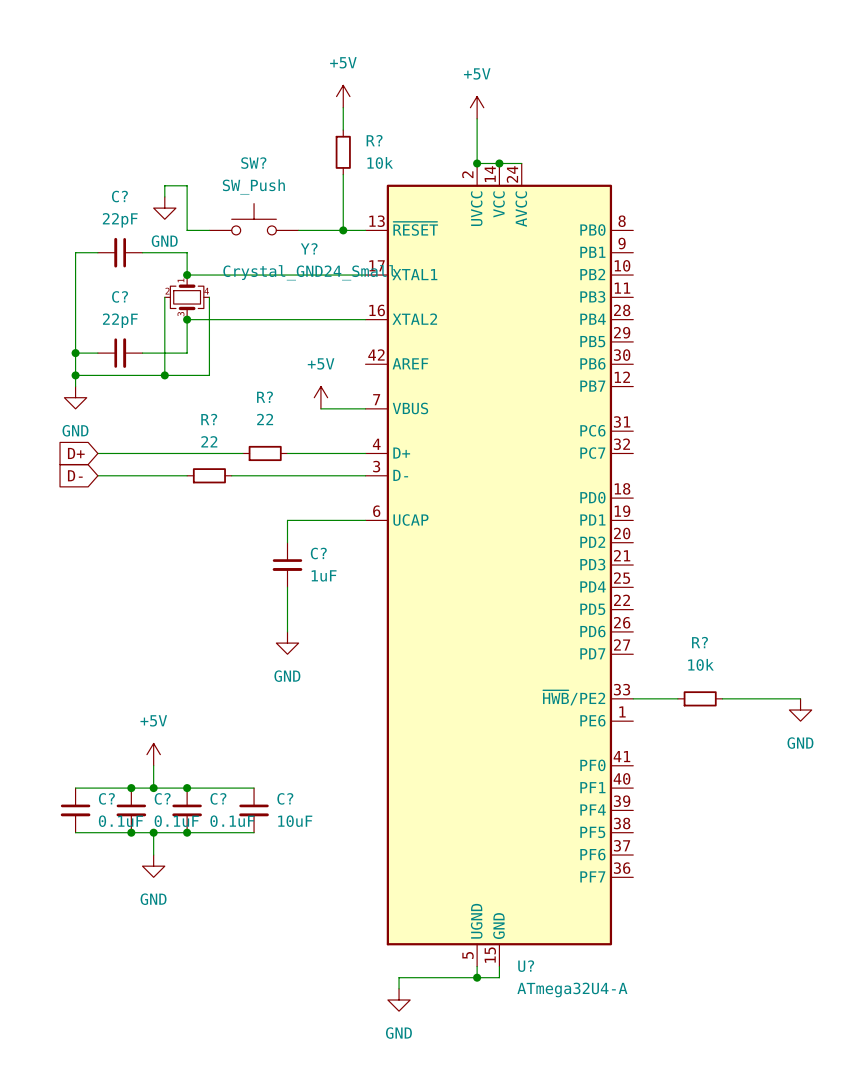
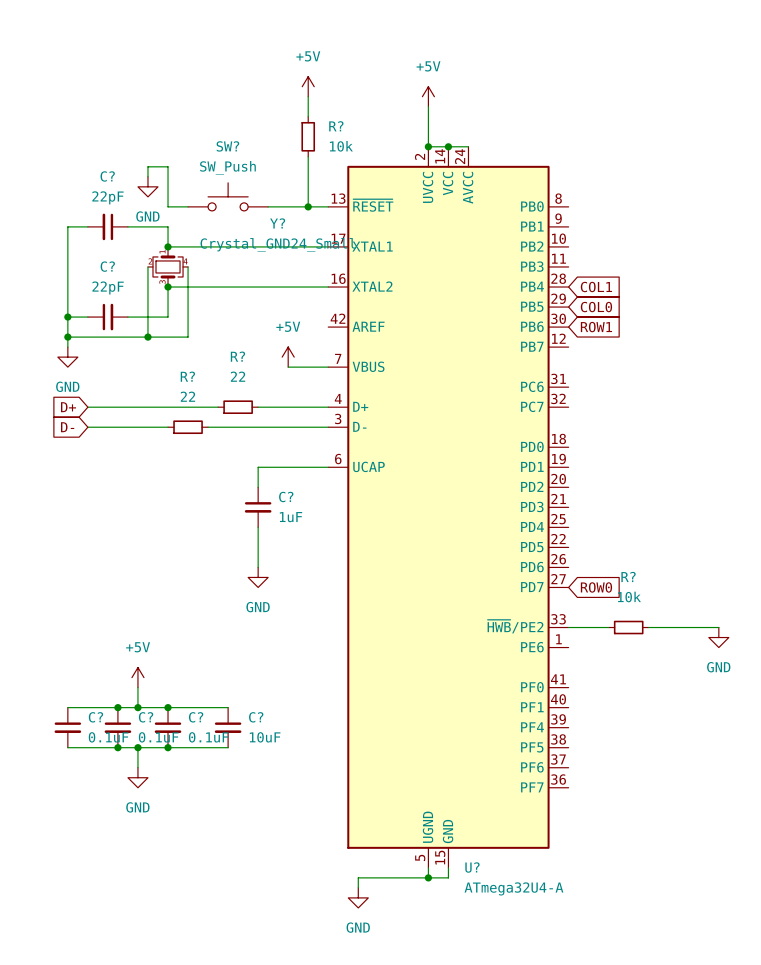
global label: none -> COL1 (596, 287)
global label: none -> COL0 (596, 307)
global label: none -> ROW1 (596, 327)
global label: none -> ROW0 (596, 587)

